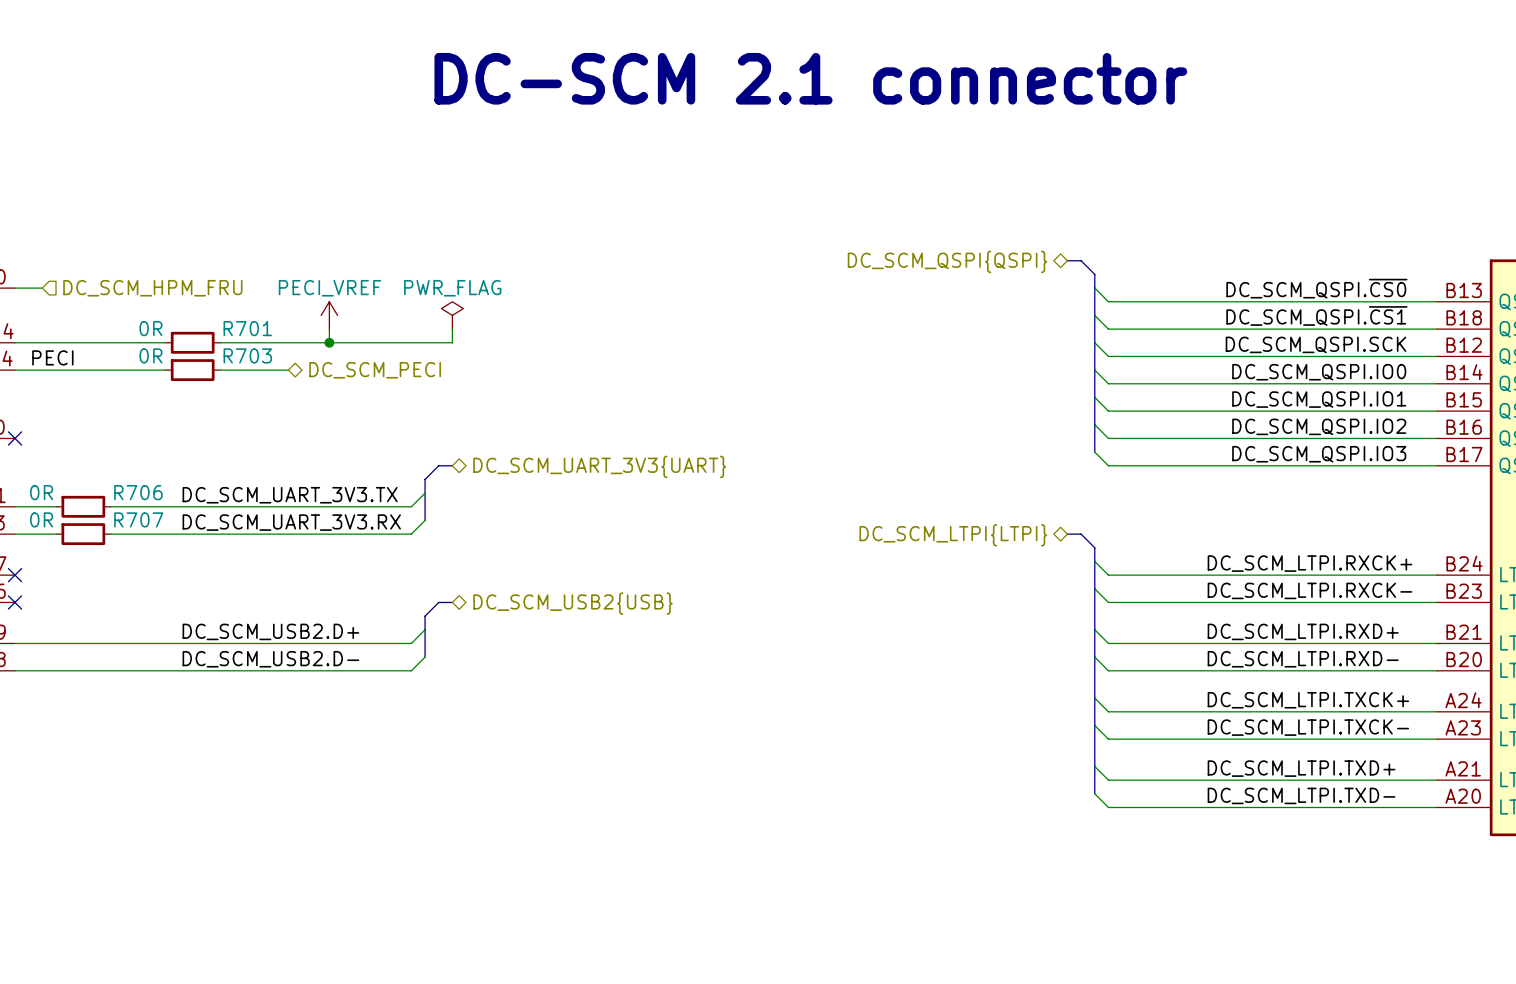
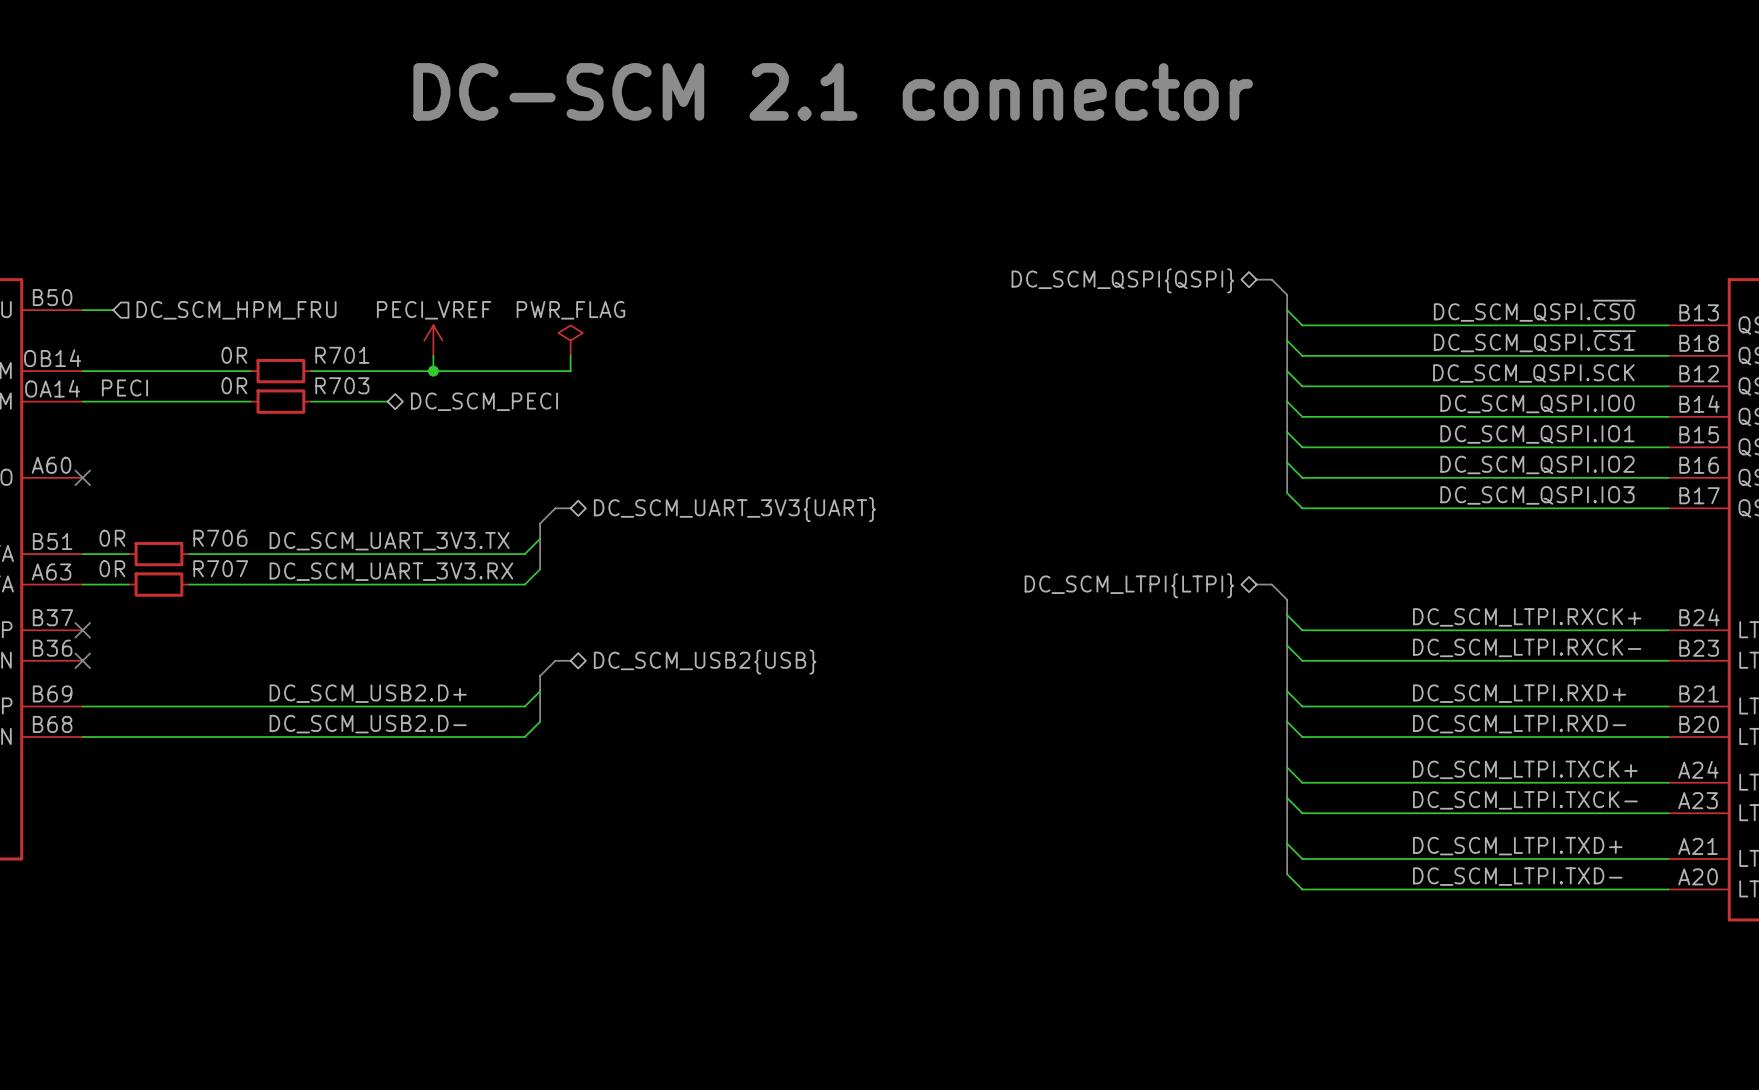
text position: DC-SCM 2.1 connector (810, 78) -> DC-SCM 2.1 connector (833, 91)

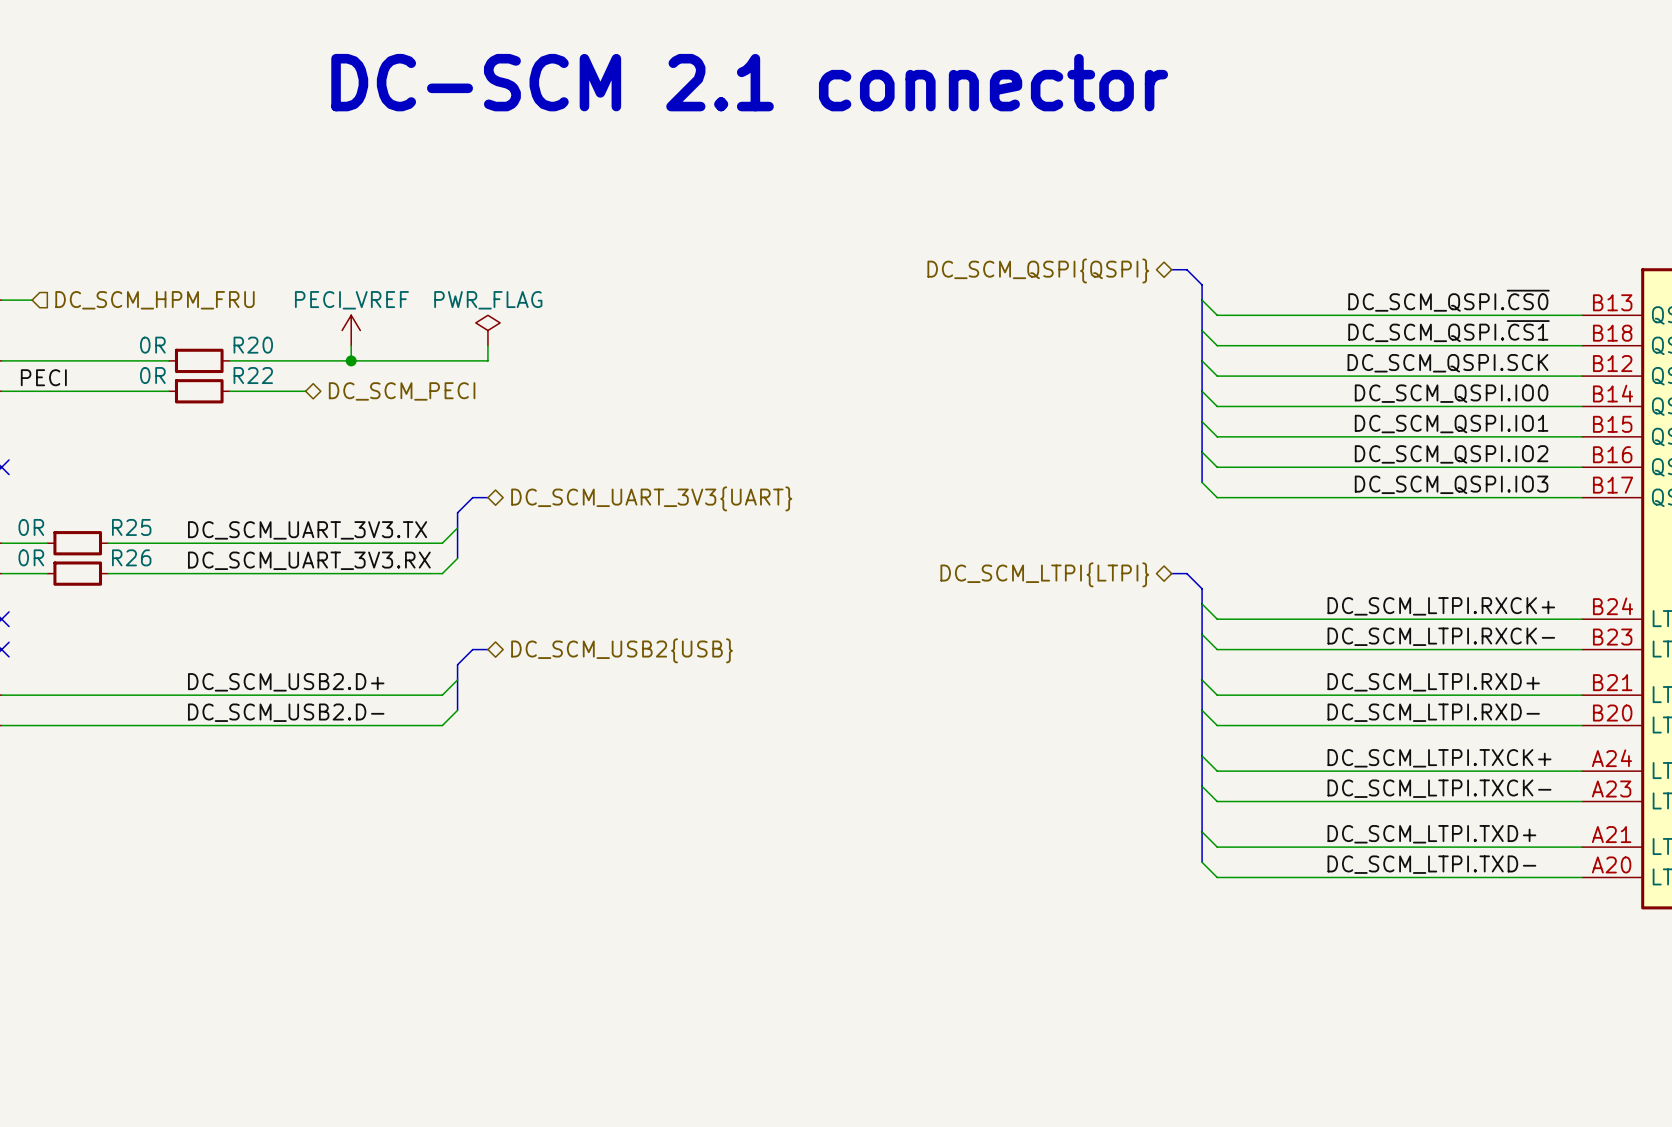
R701 name: R701 (342, 355) -> R20 (253, 345)
R703 name: R703 (342, 385) -> R22 (253, 375)
R706 name: R706 (220, 538) -> R25 (131, 527)
R707 name: R707 (220, 568) -> R26 (131, 557)

